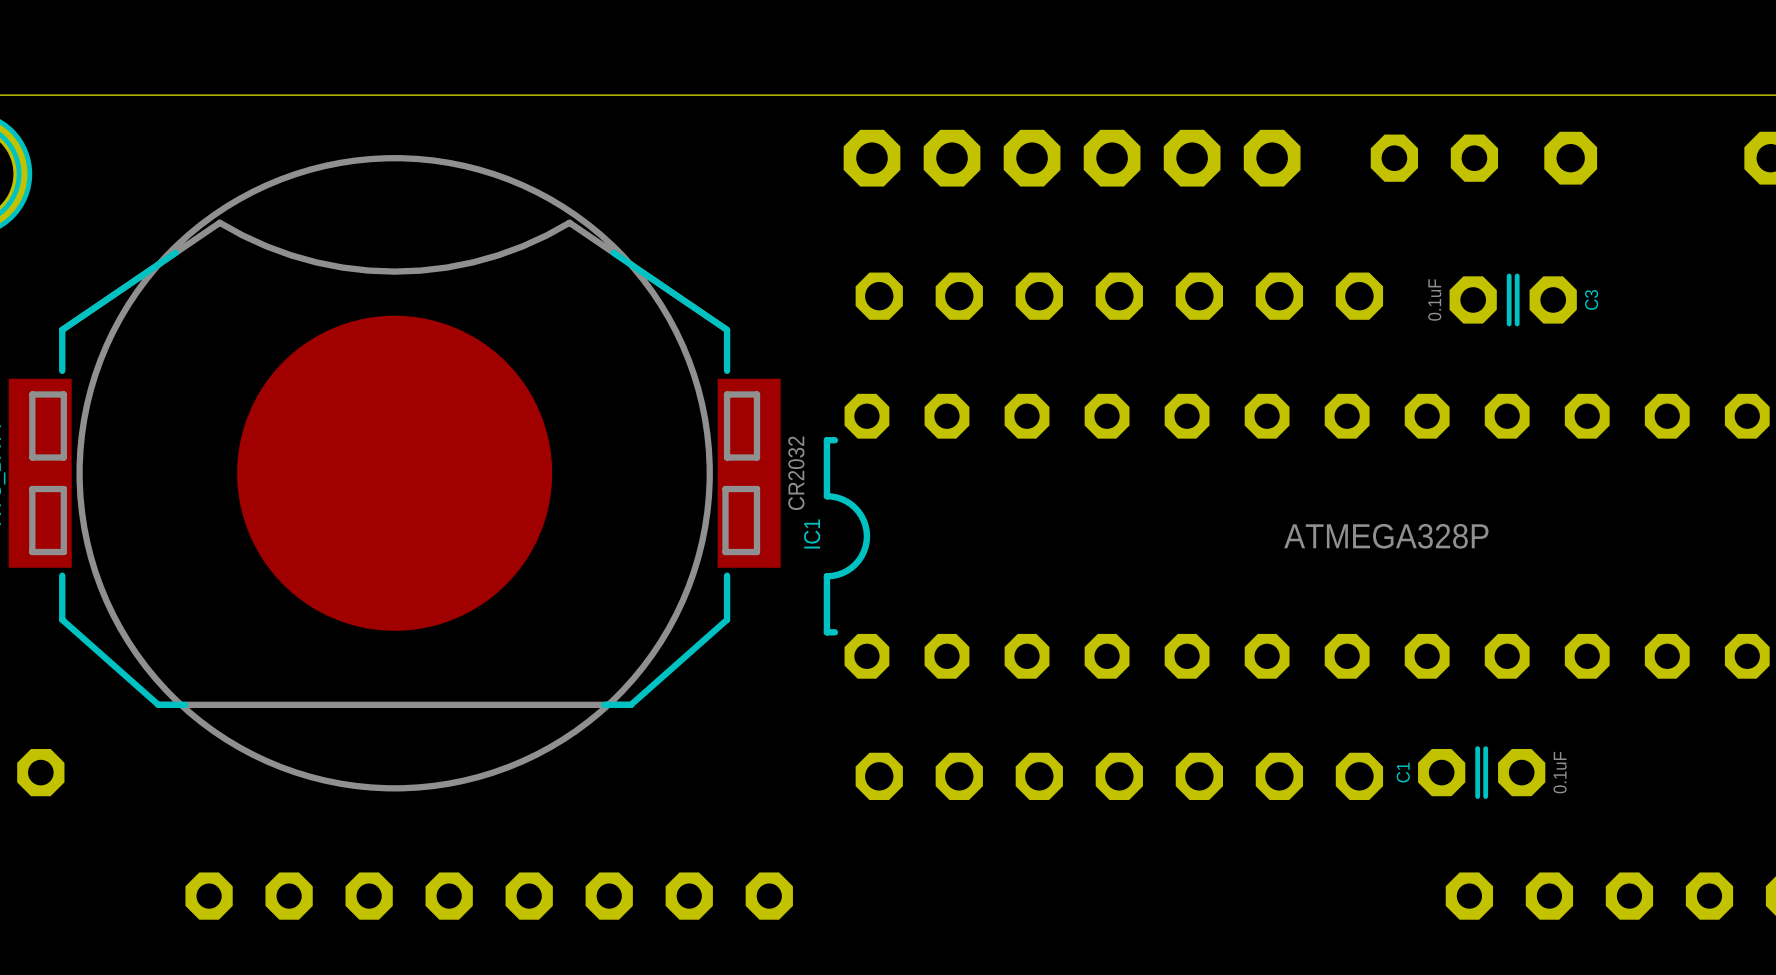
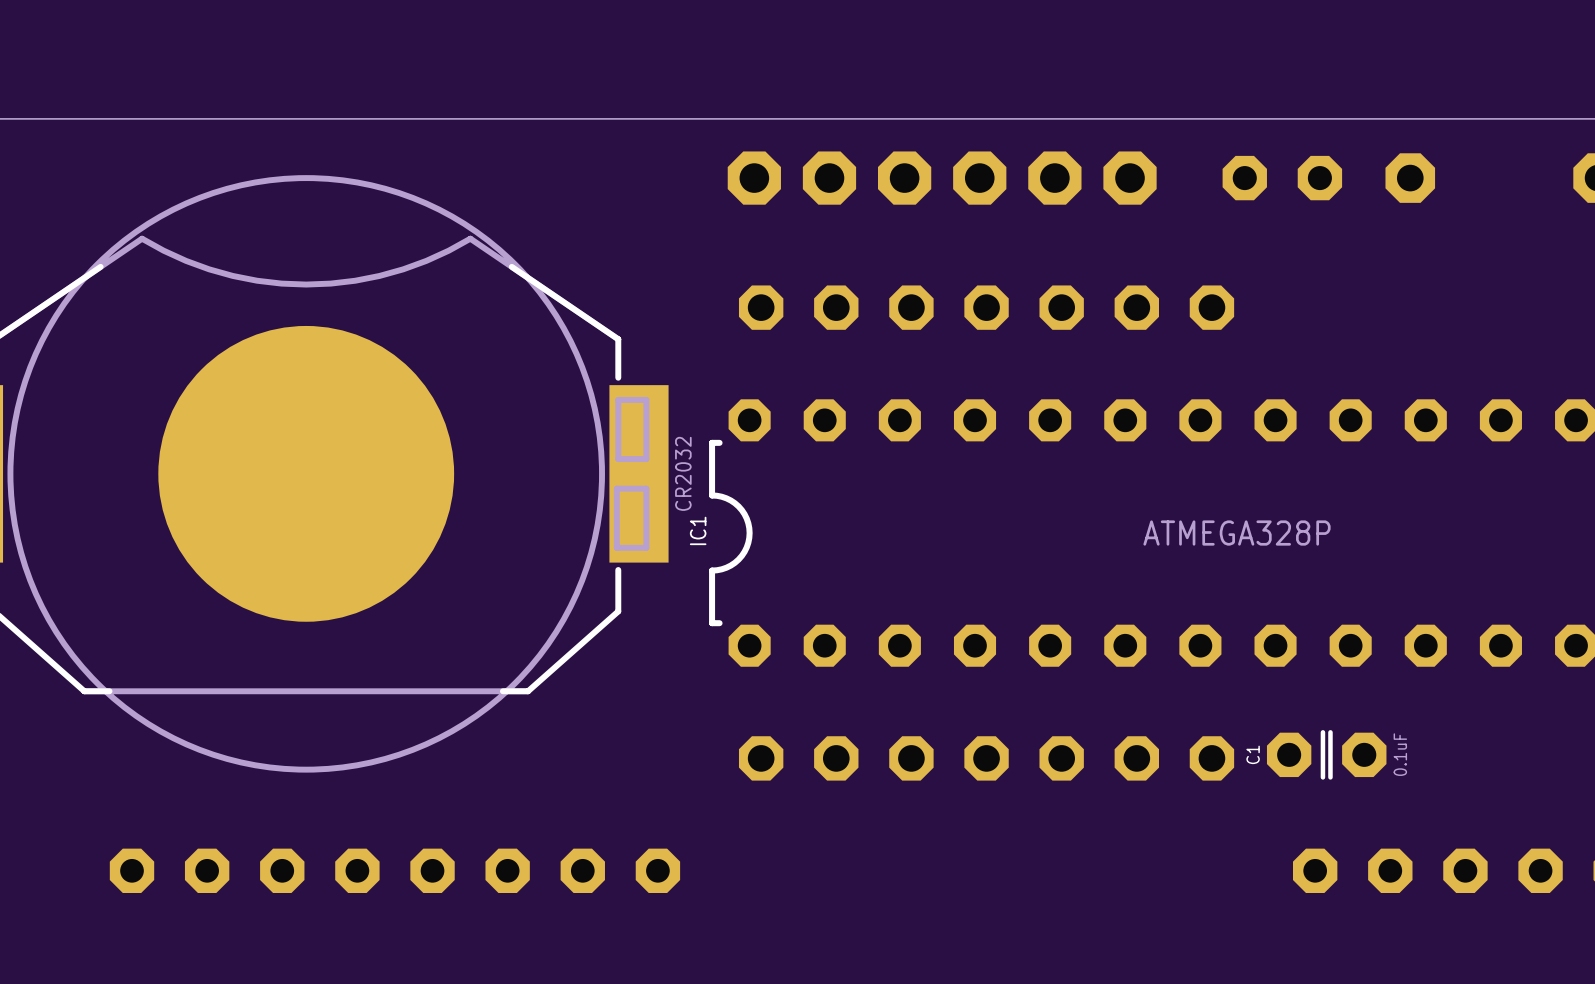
C3: 0.1uF (1513, 299) -> none

